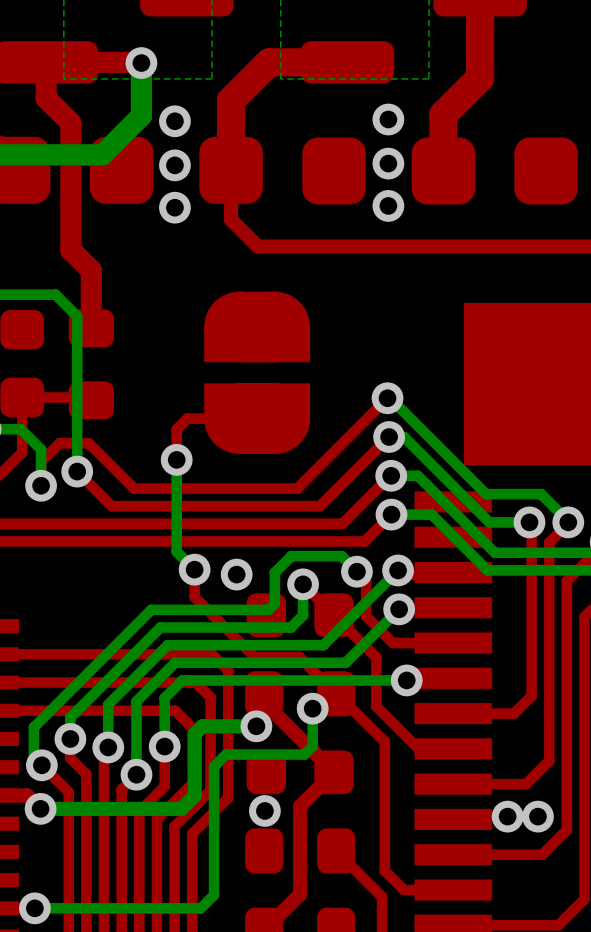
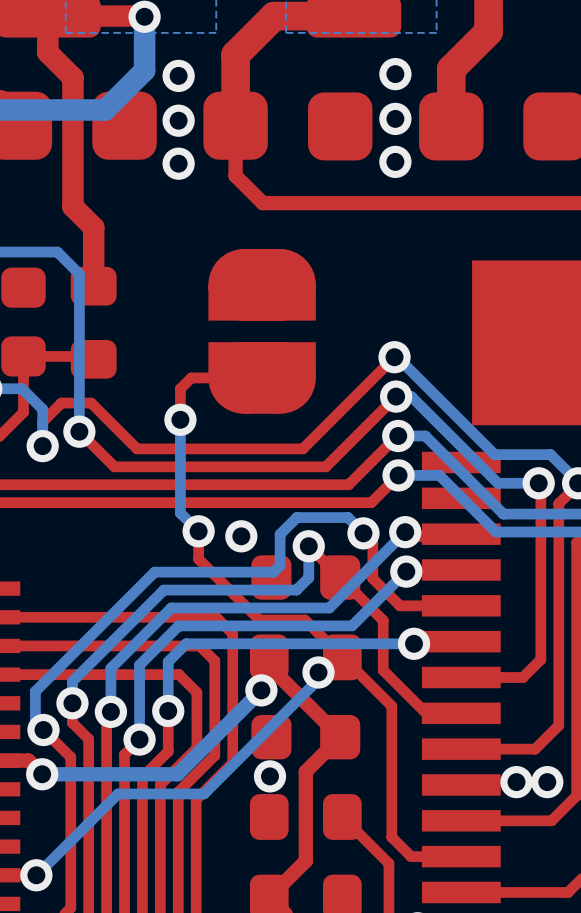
bottom track: (312, 715) (312, 746) (304, 754) (226, 754) (214, 766) (214, 894) (200, 908) (35, 908) -> (318, 679) (204, 793) (118, 793) (36, 875)
bottom track: (256, 726) (202, 726) (194, 734) (194, 795) (181, 808) (173, 808) -> (261, 690) (177, 774)

